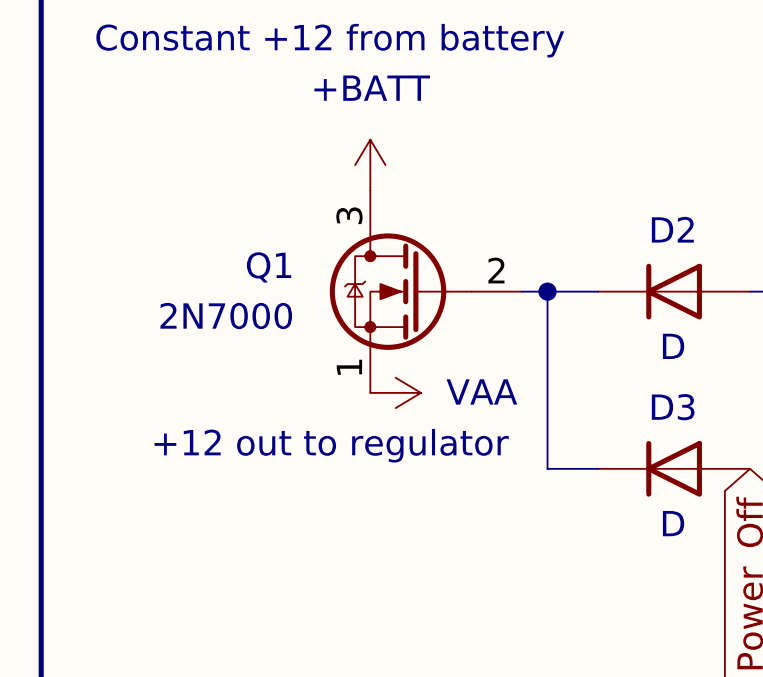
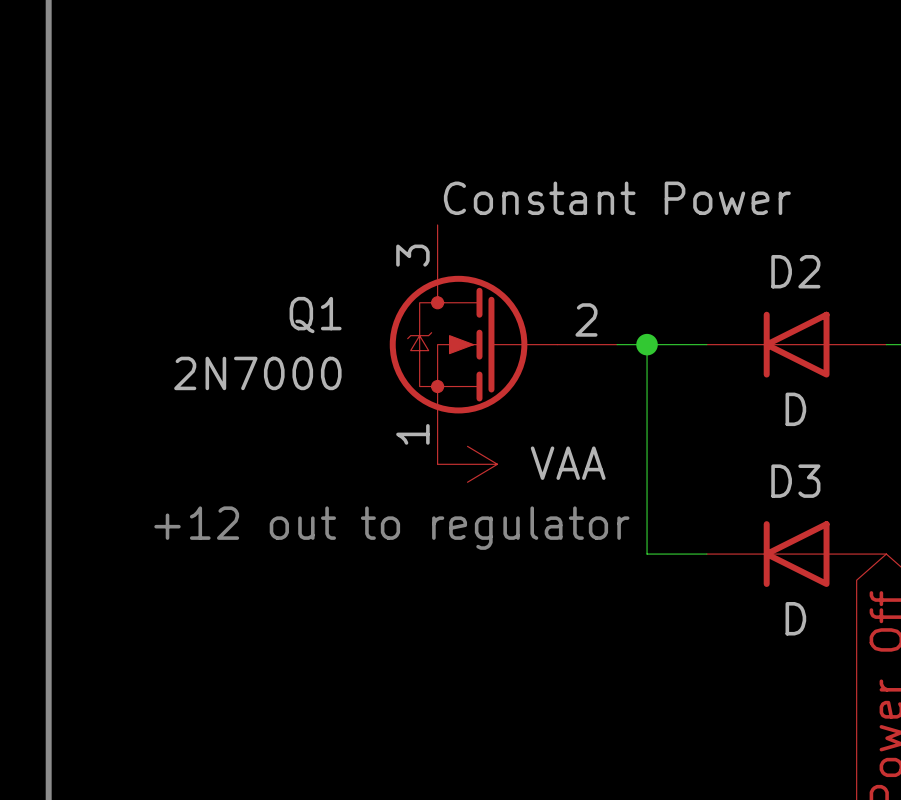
text: Constant +12 from battery (330, 40) -> none
power symbol: +BATT (370, 165) -> none
label: none -> Constant Power (617, 198)

